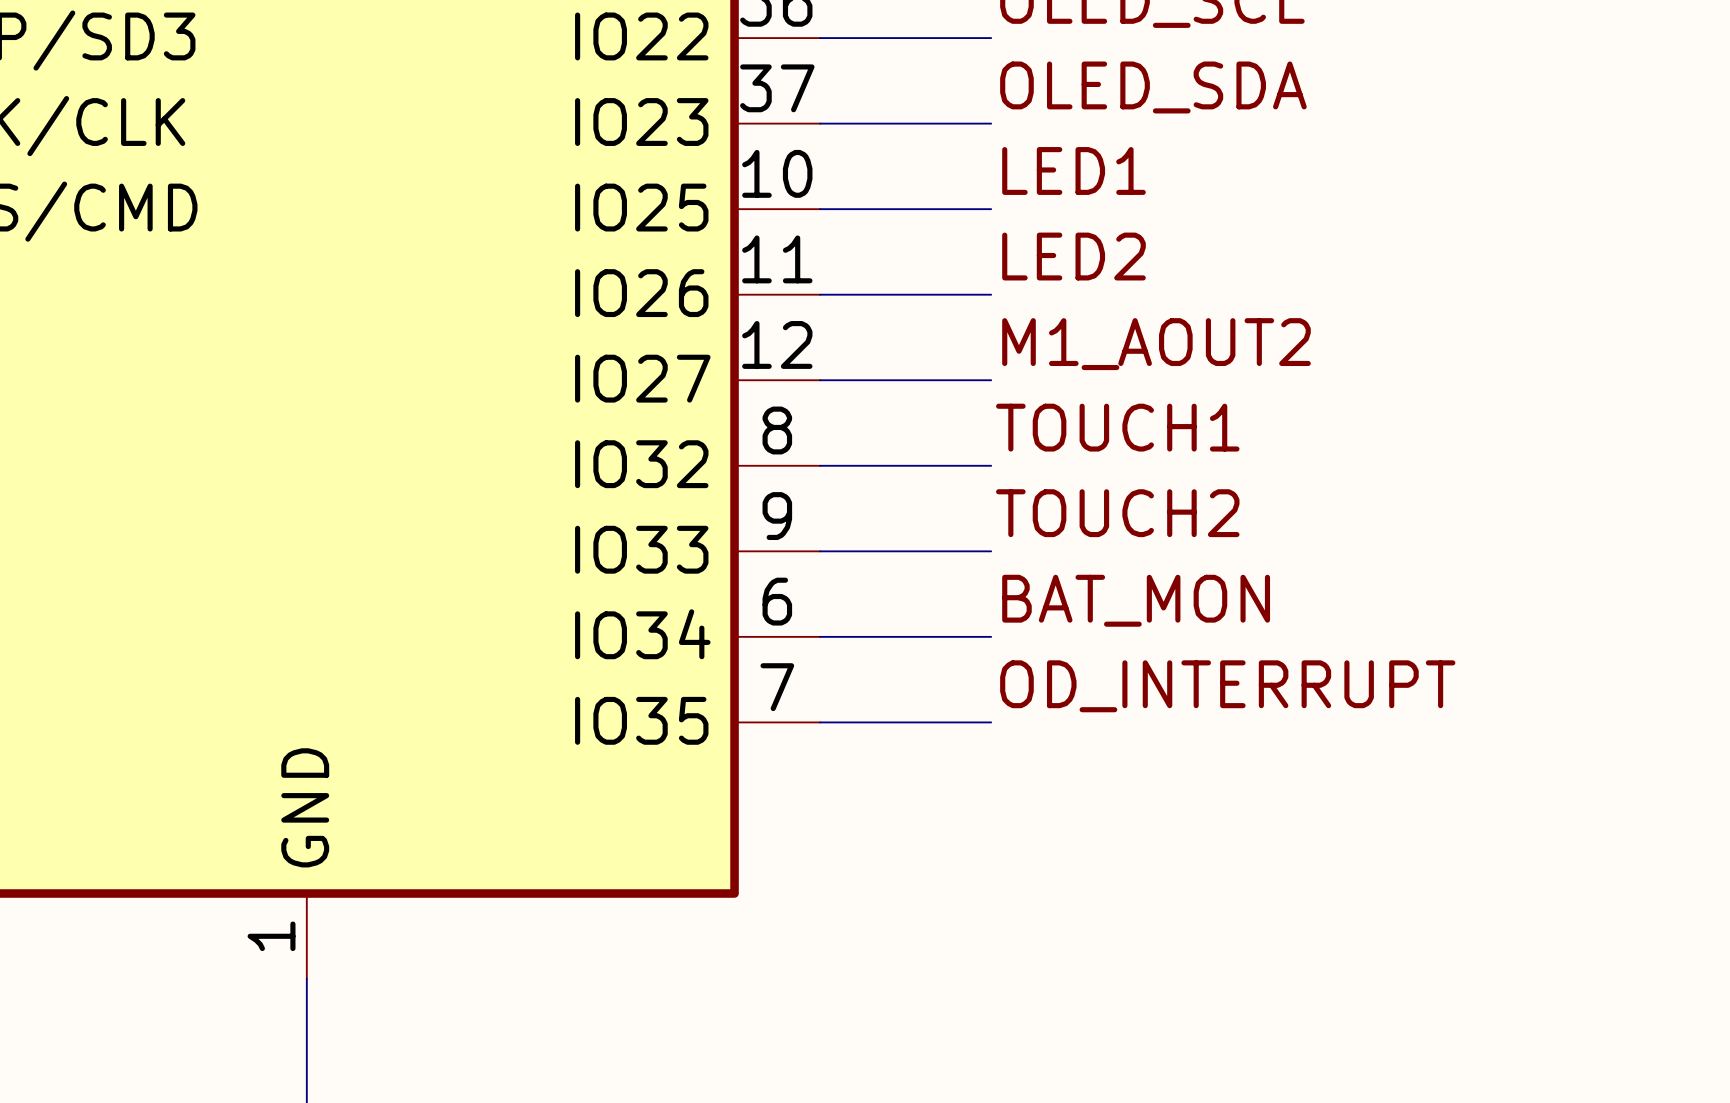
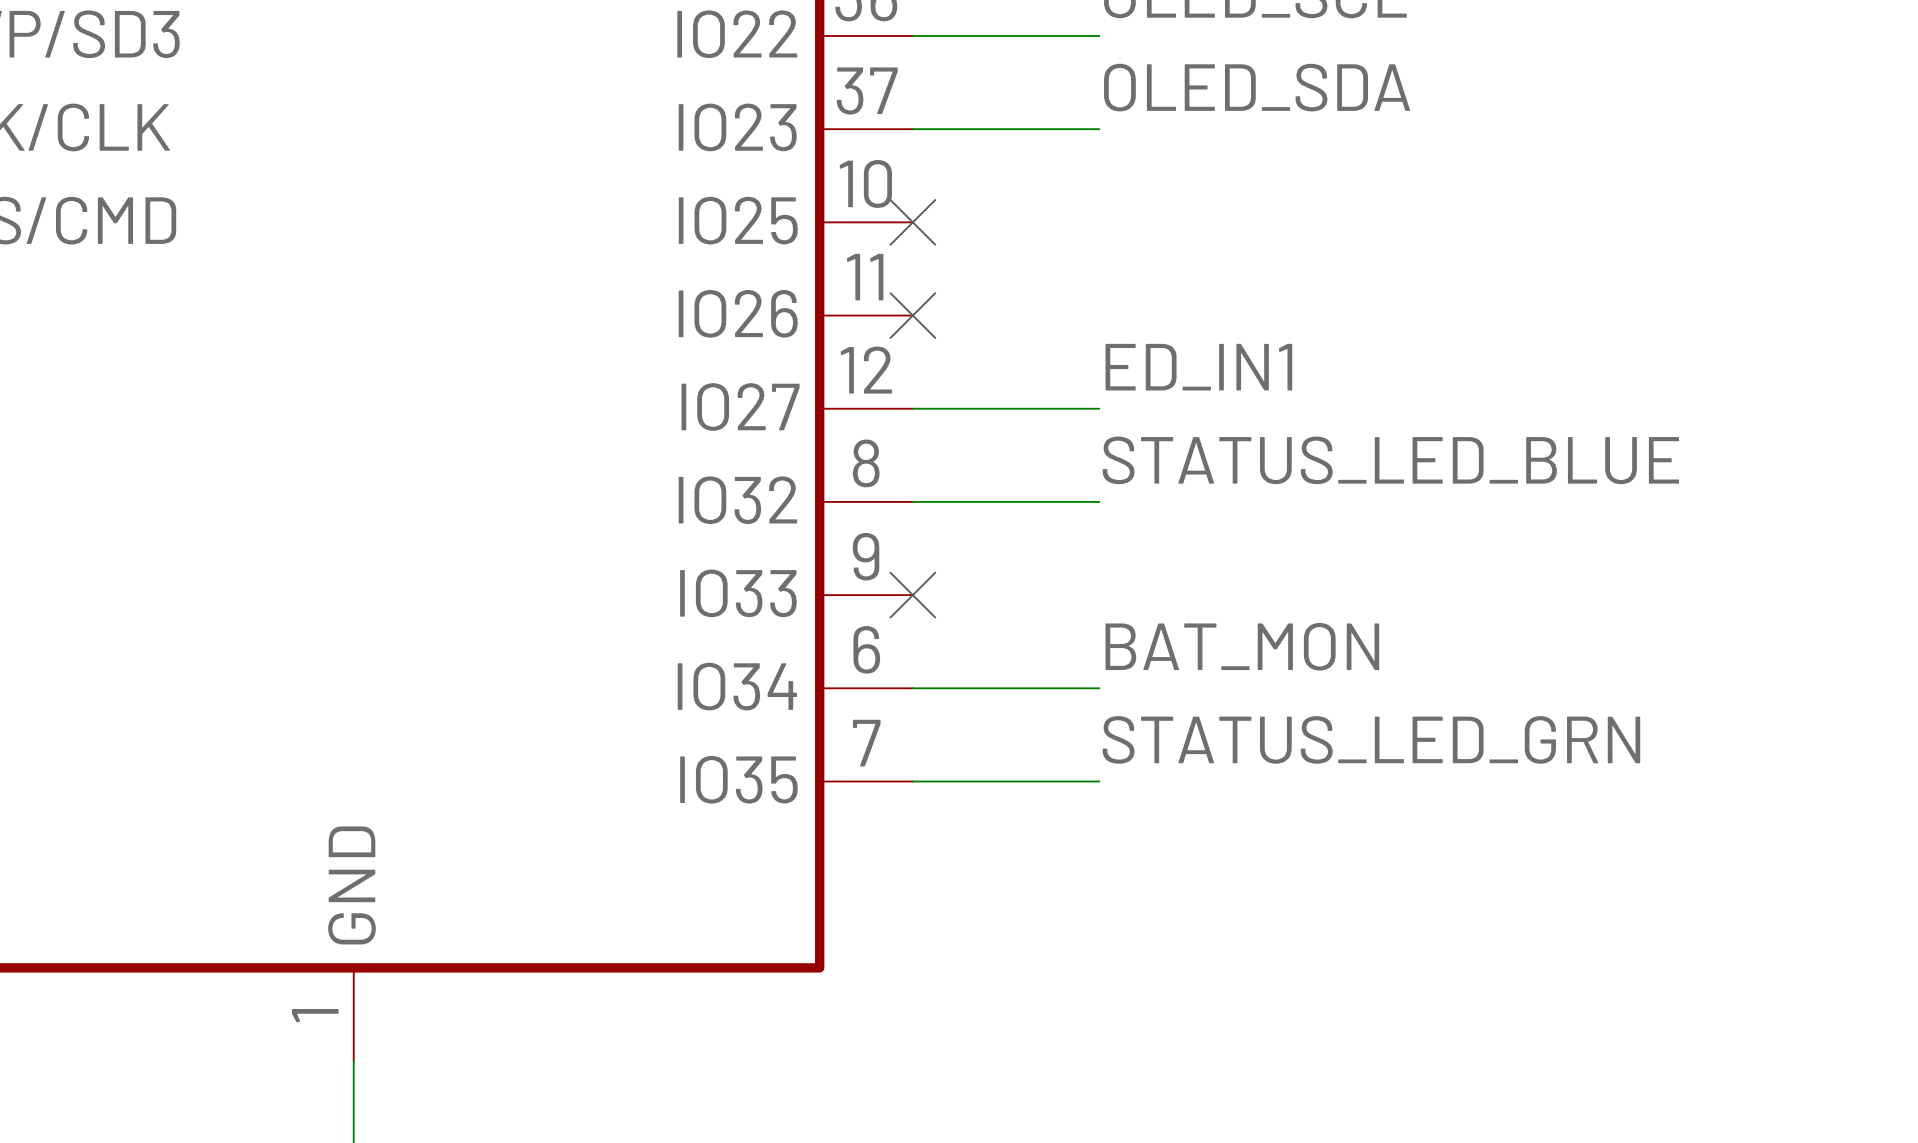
label: LED1 (1073, 170) -> none
wire: (820, 209) (991, 209) -> none
no-connect mark: none -> (912, 222)
label: LED2 (1073, 256) -> none
wire: (820, 294) (991, 294) -> none
no-connect mark: none -> (912, 315)
label: M1_AOUT2 (1156, 344) -> ED_IN1 (1198, 367)
label: TOUCH1 (1117, 427) -> STATUS_LED_BLUE (1390, 460)
label: TOUCH2 (1117, 513) -> none
wire: (820, 551) (991, 551) -> none
no-connect mark: none -> (912, 595)
label: OD_INTERRUPT (1227, 686) -> STATUS_LED_GRN (1371, 739)

